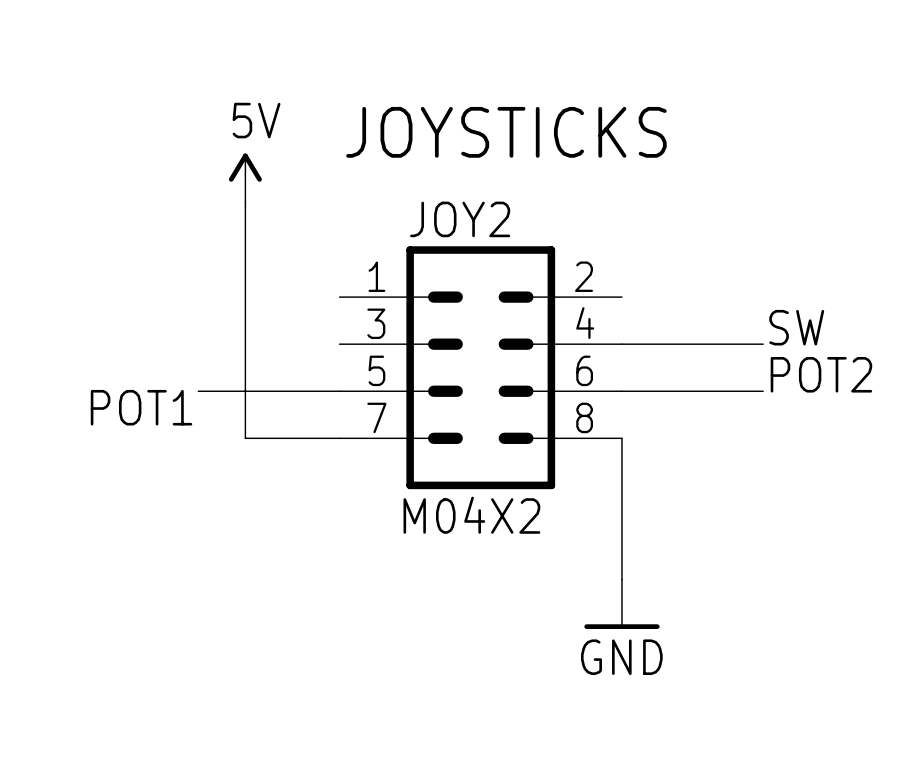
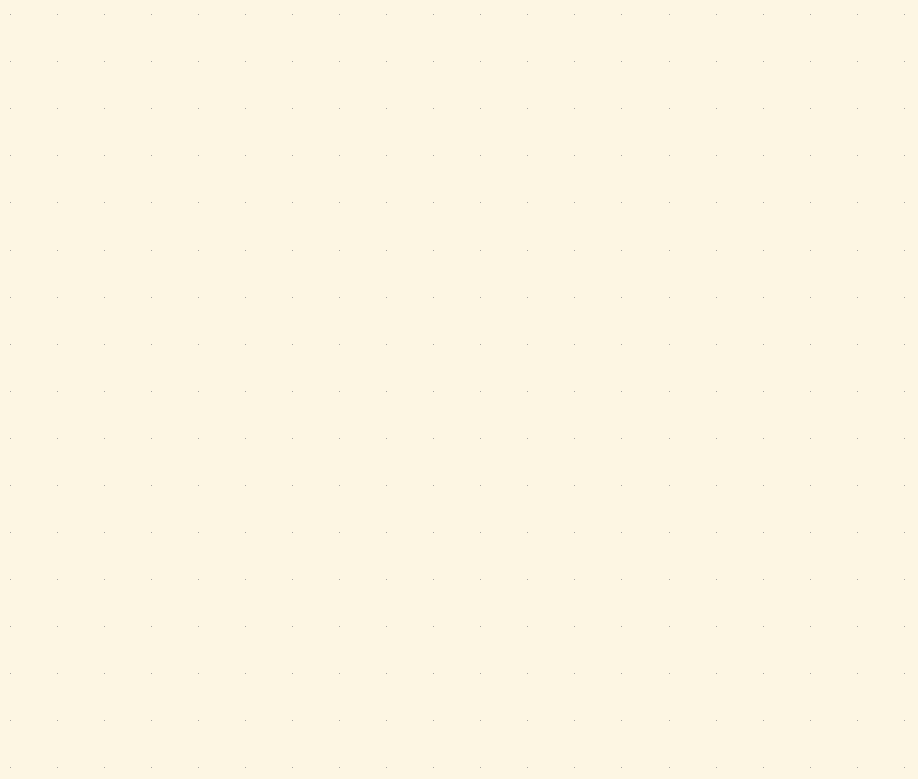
text: JOYSTICKS (506, 132) -> none
power symbol: 5V (245, 178) -> none
wire: (245, 202) (245, 438) (339, 438) -> none
label: SW (796, 327) -> none
wire: (621, 344) (763, 344) -> none
JOY2: M04X2 (480, 367) -> none
label: POT2 (821, 374) -> none
wire: (198, 391) (339, 391) -> none
wire: (621, 391) (763, 391) -> none
label: POT1 (141, 407) -> none
wire: (621, 438) (621, 579) -> none
power symbol: GND (621, 604) -> none

